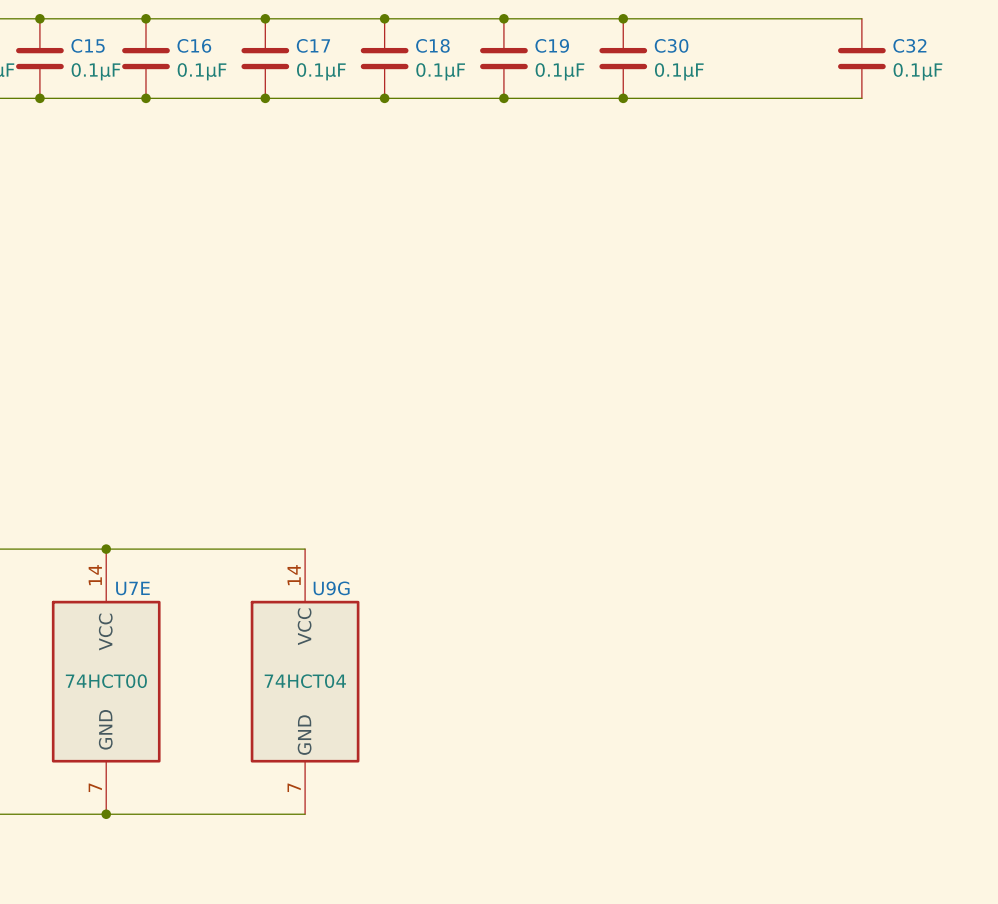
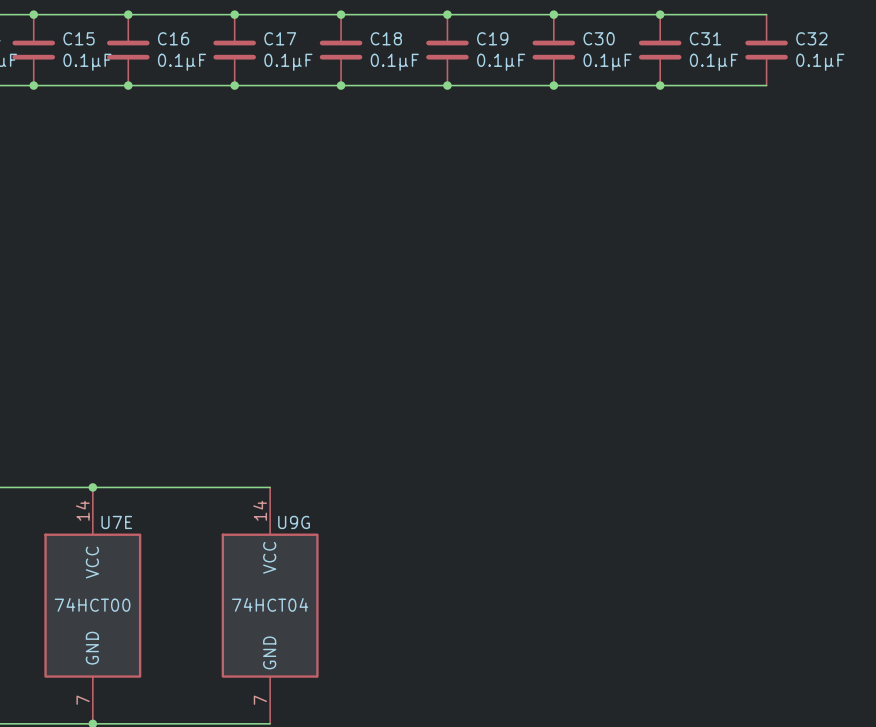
junction: none -> (660, 14)
C31: none -> 0.1µF (660, 50)
junction: none -> (660, 85)

